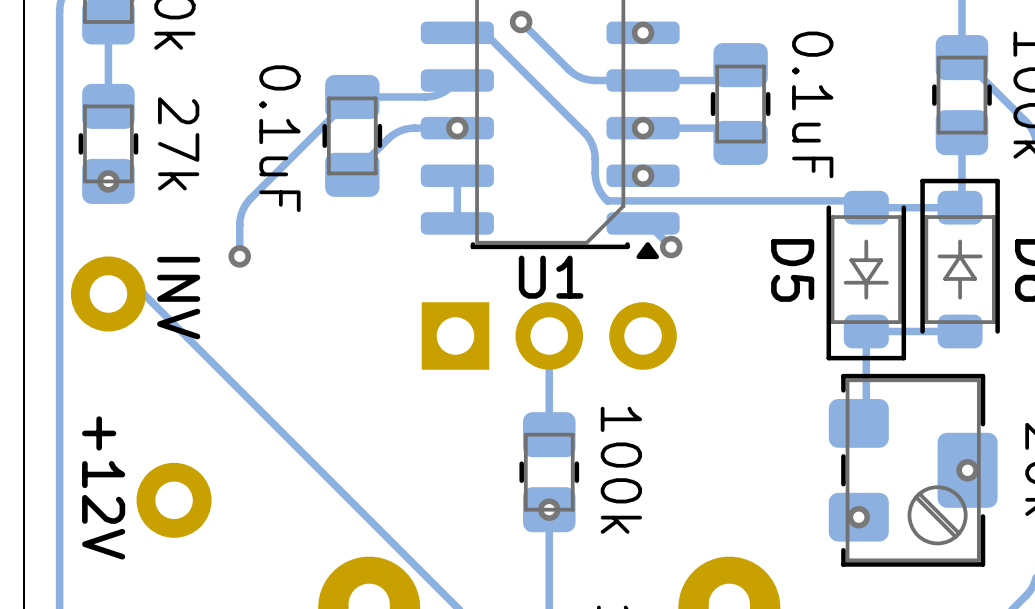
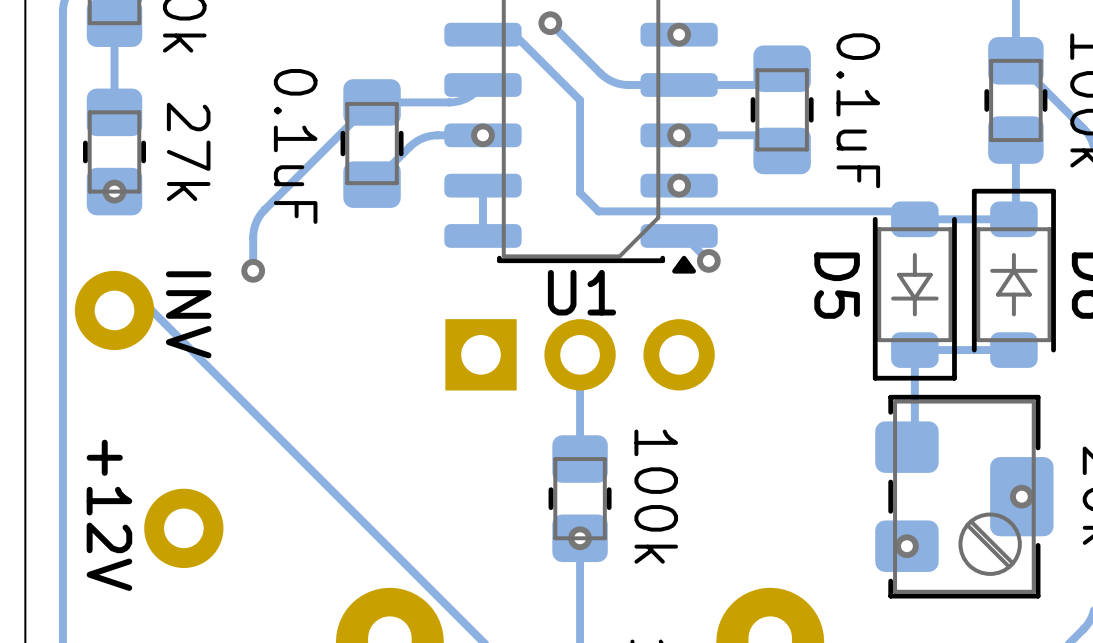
track: (457, 32) (484, 32) (586, 135) (594, 151) (596, 183) (607, 200) (859, 200) -> (514, 34) (580, 100) (580, 192) (598, 211) (906, 211)

